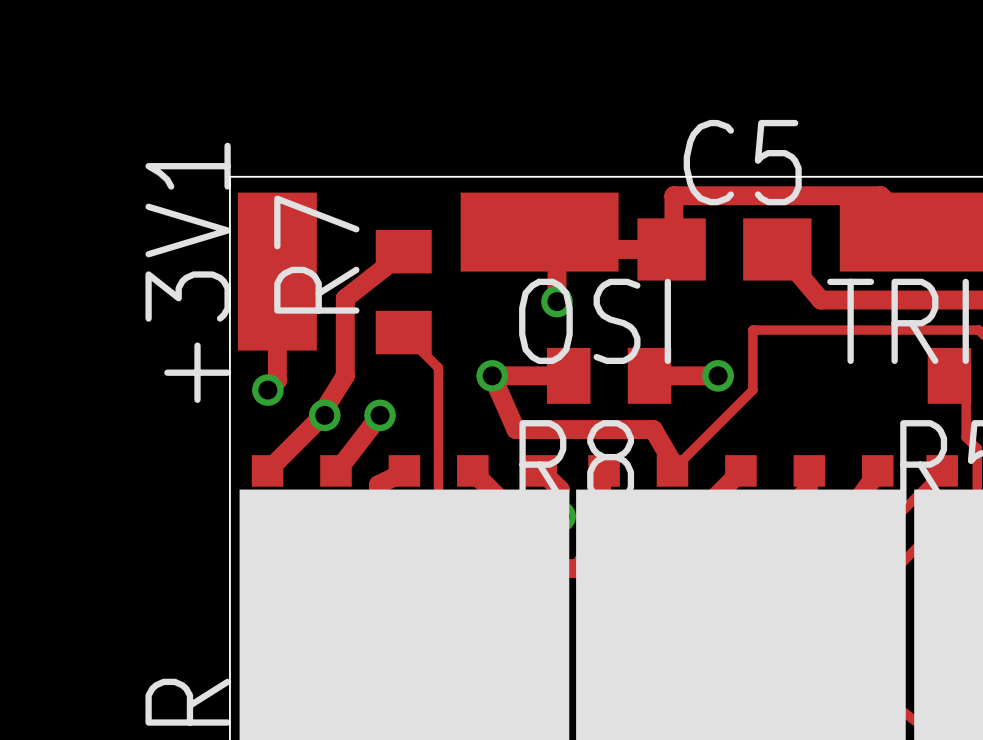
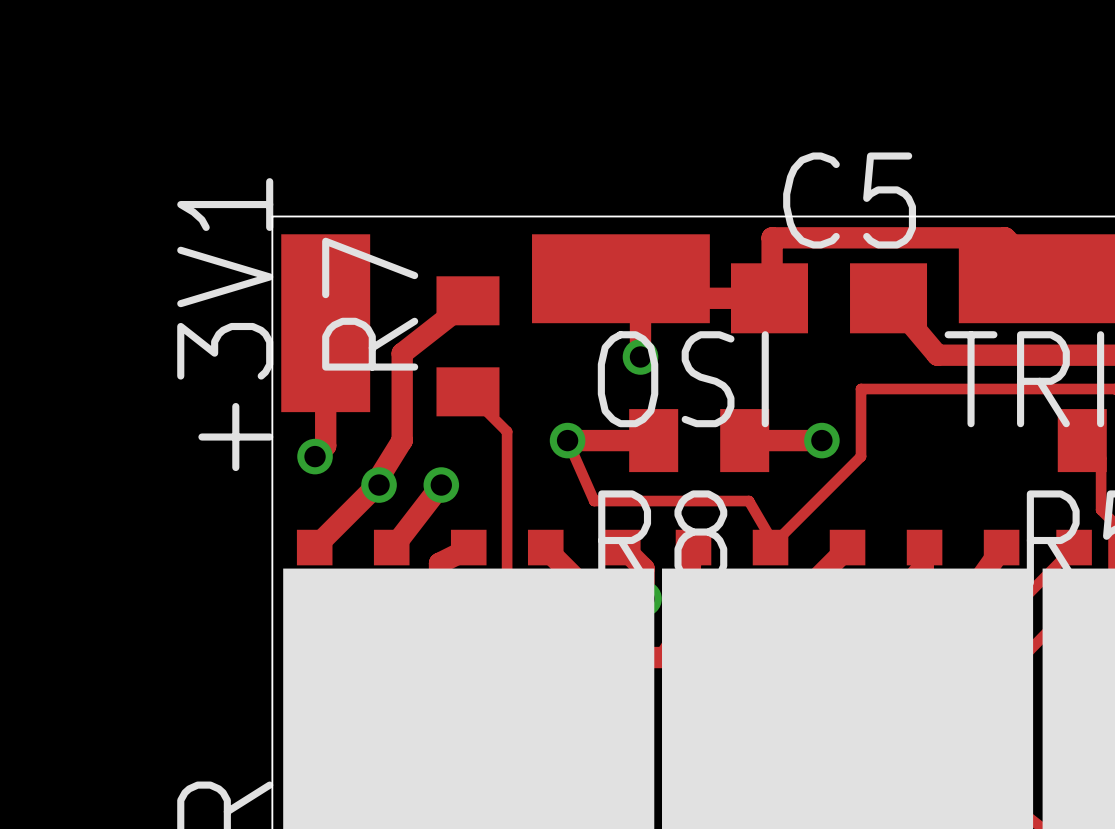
track width: thick (492, 375) (515, 429) (653, 429) (675, 467) -> thin (567, 440) (594, 501) (748, 501) (773, 543)

